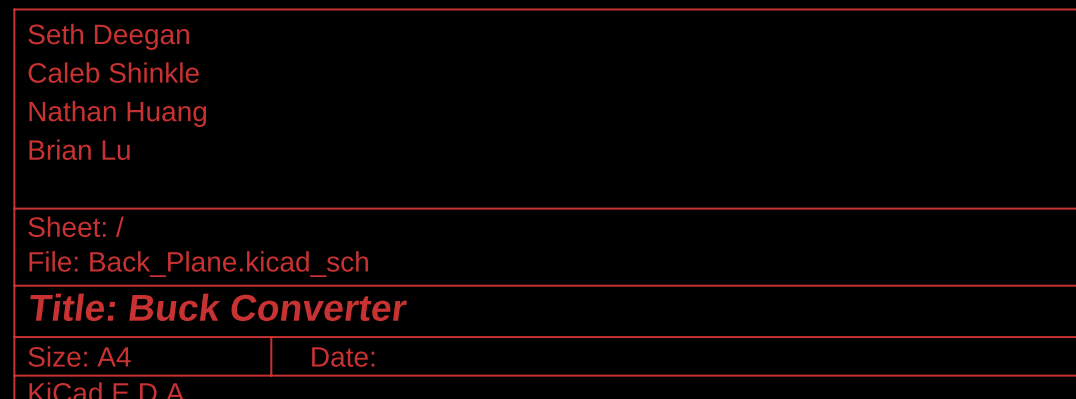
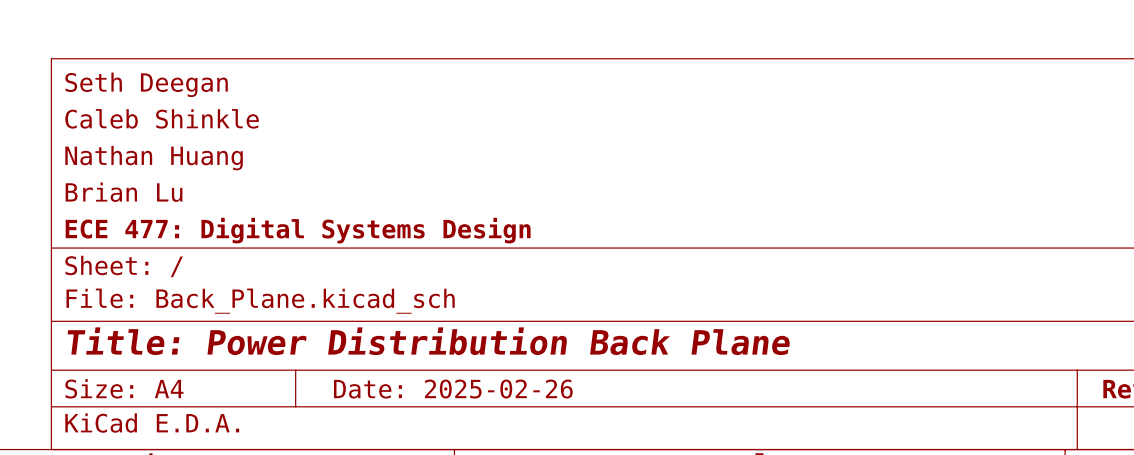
title block: none -> ECE 477: Digital Systems Design (298, 230)
title block: Title: Buck Converter (218, 307) -> Title: Power Distribution Back Plane (428, 341)
title block: Date: (343, 357) -> Date: 2025-02-26 (453, 389)

